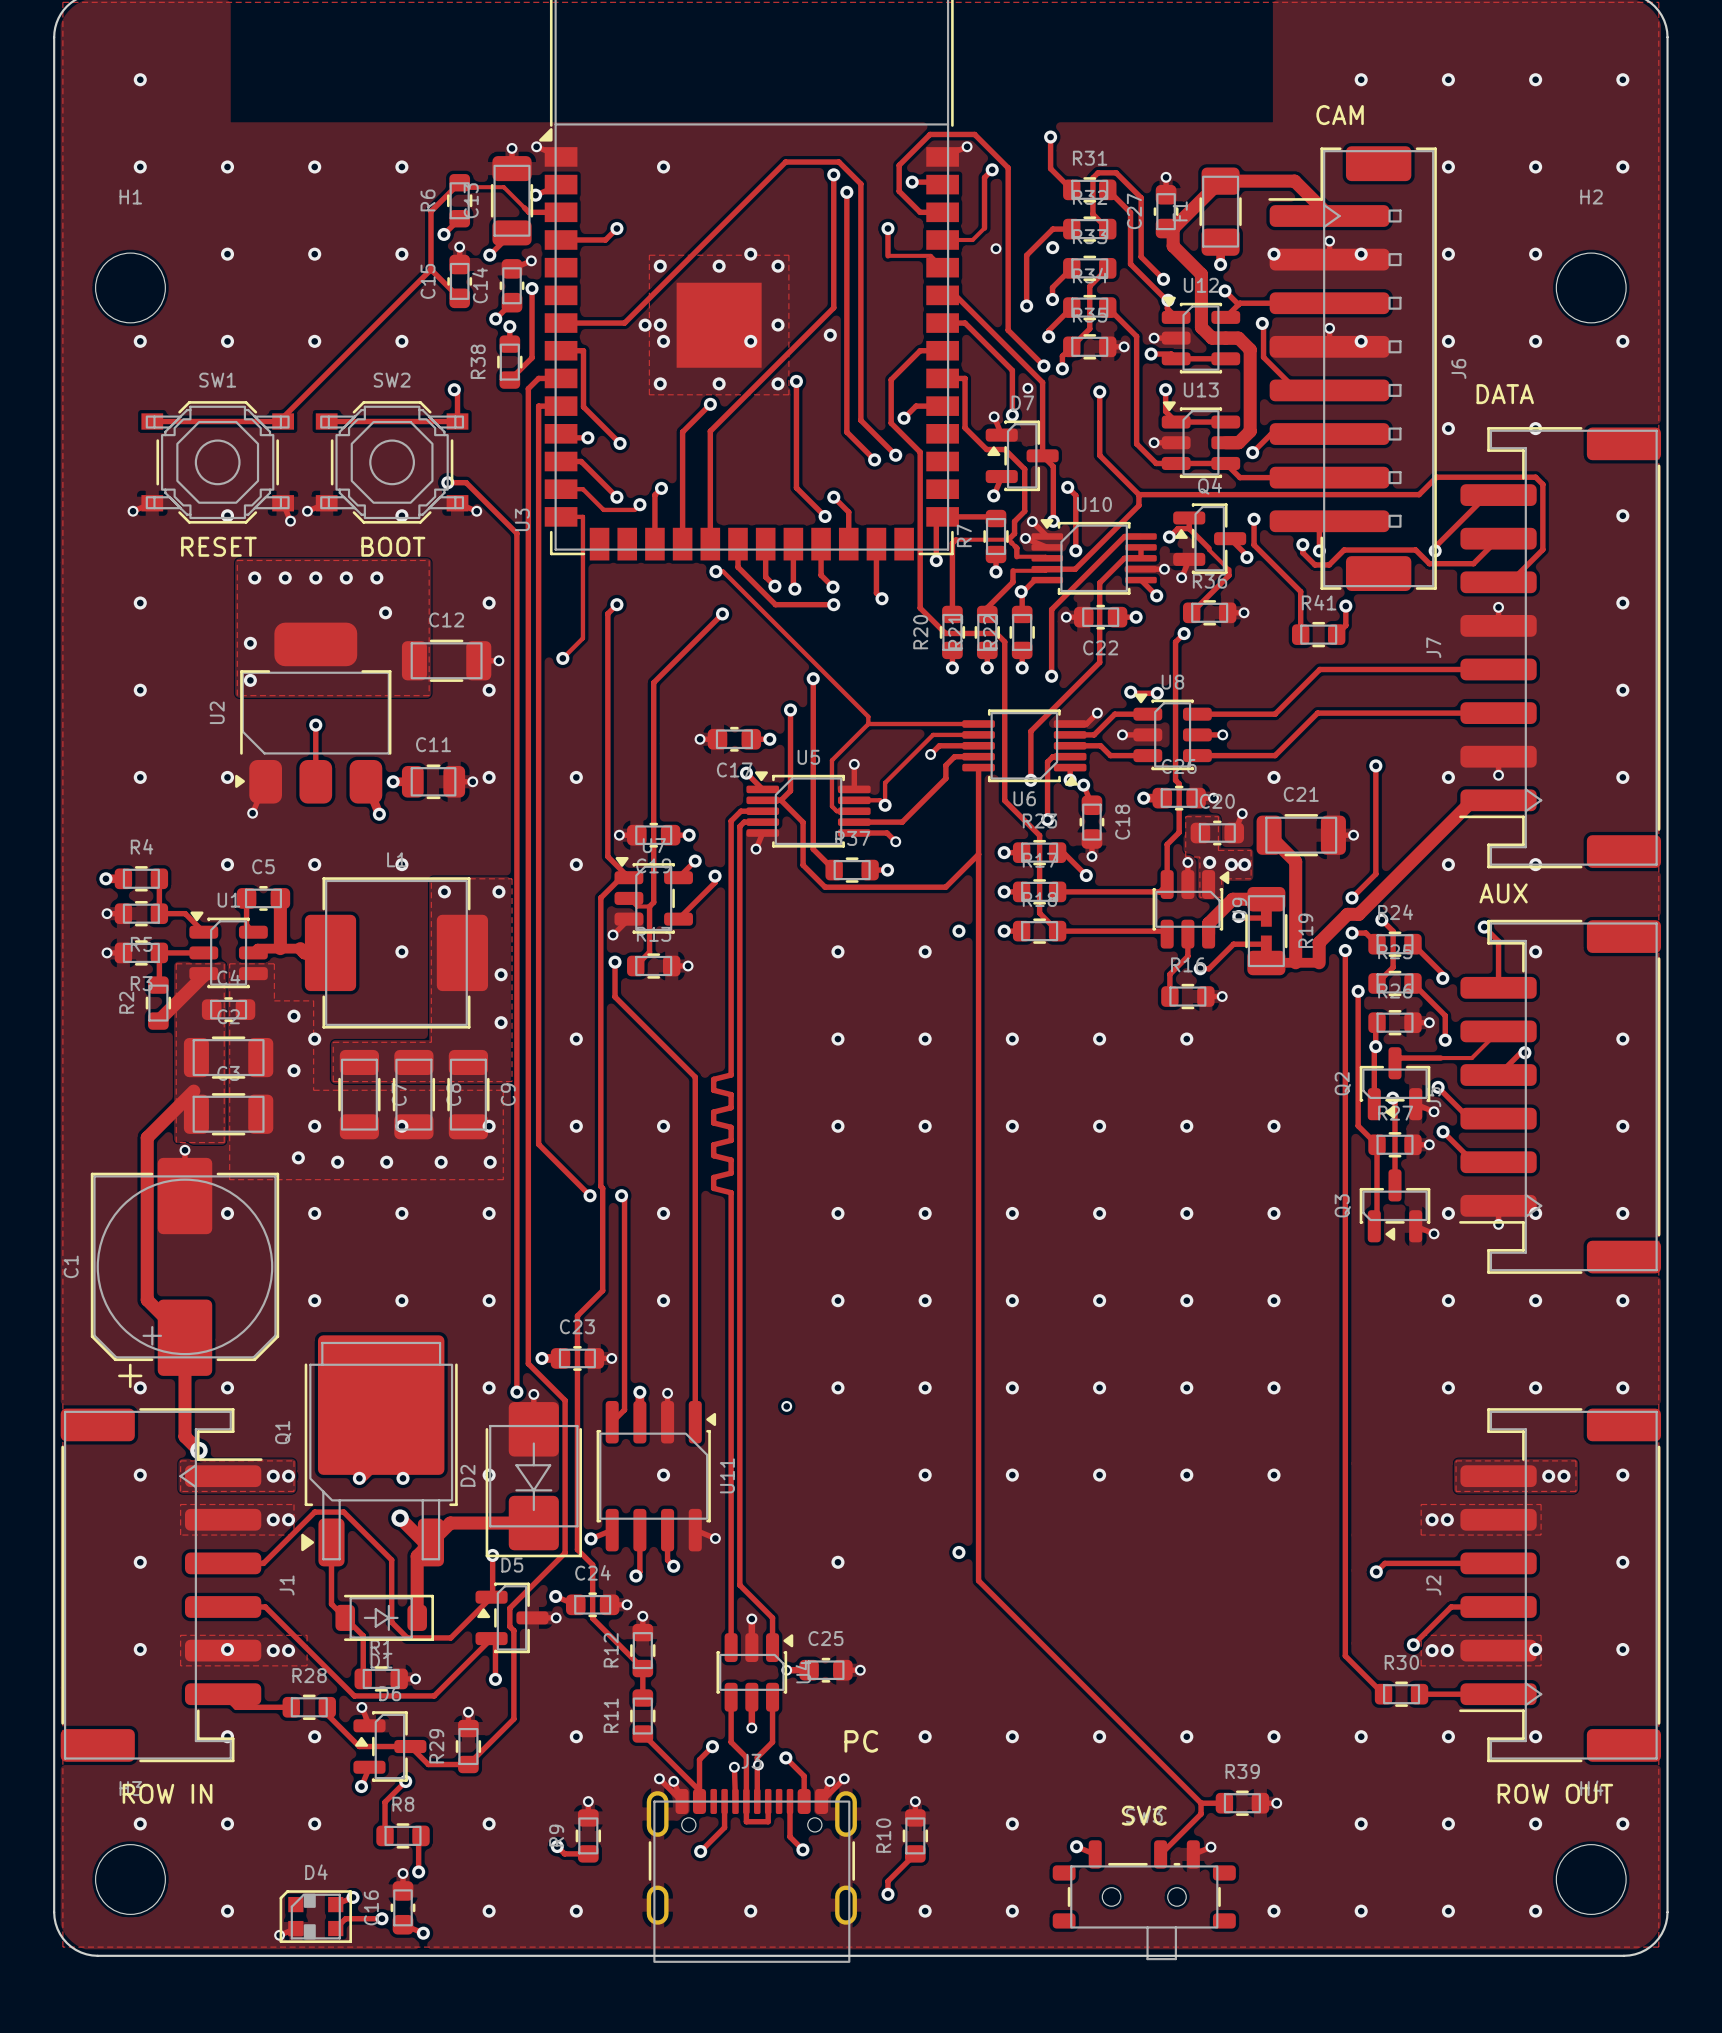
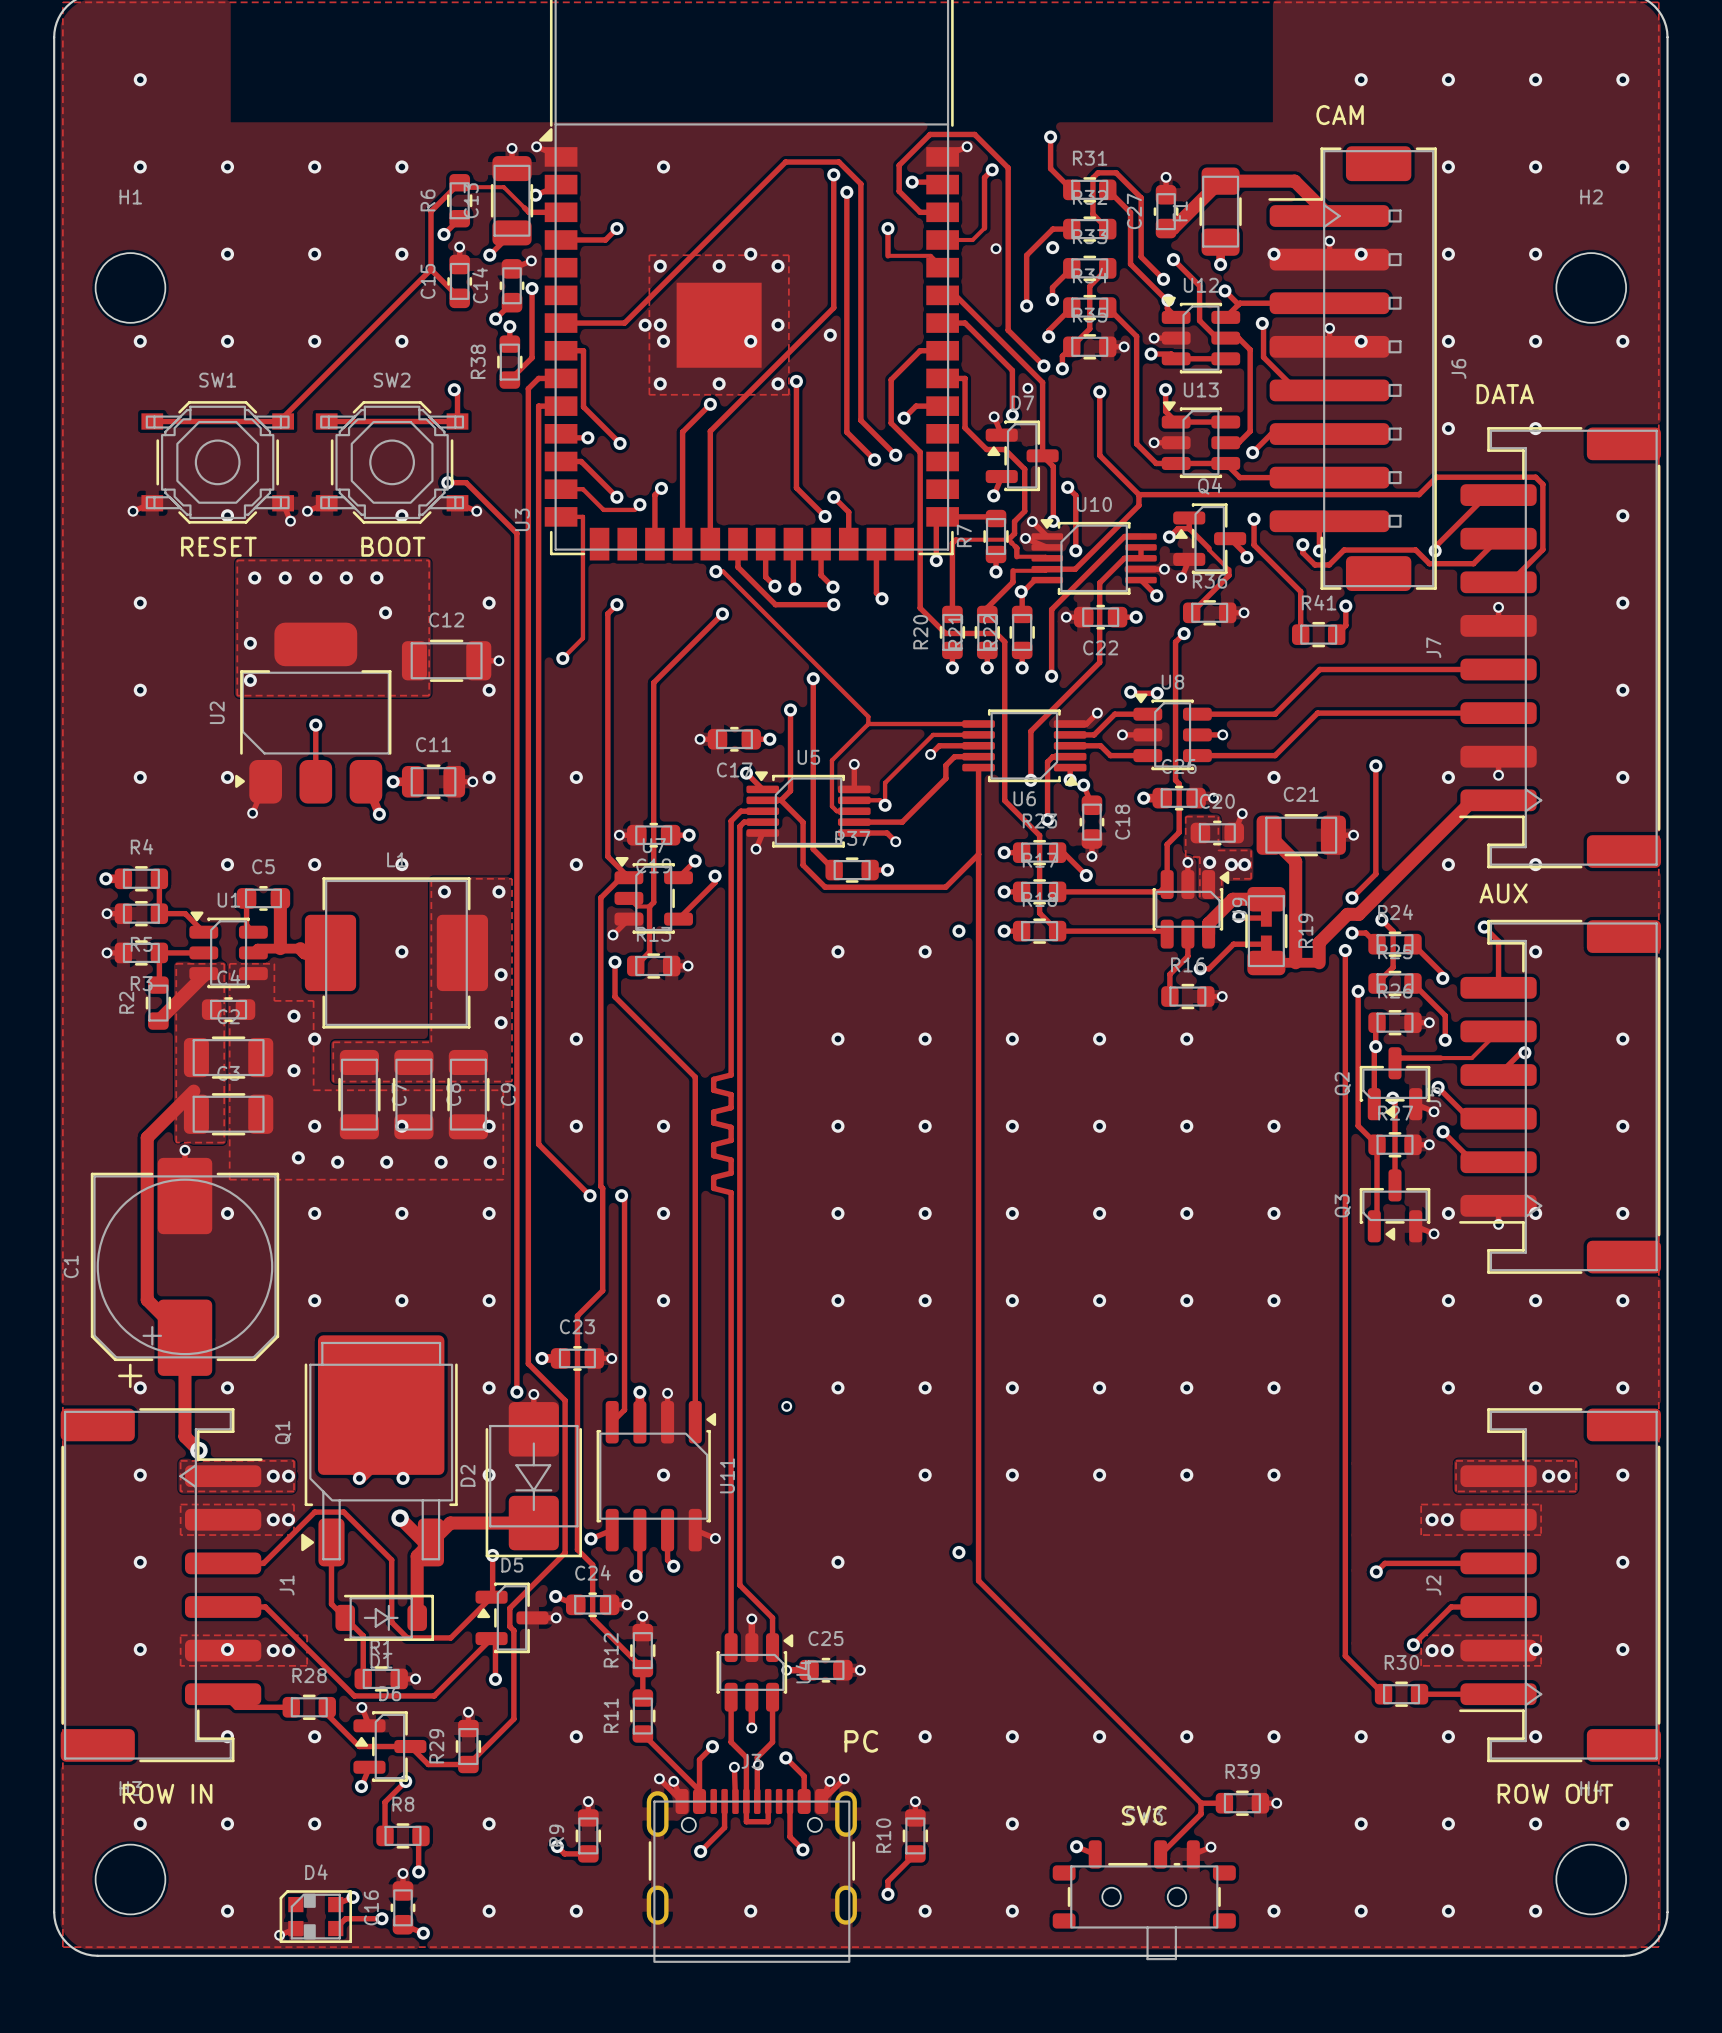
track: (1173, 228) (1173, 246) (1201, 274) (1201, 327) (1212, 338) (1217, 338) -> (1173, 259) (1199, 285) (1199, 320) (1217, 338)
via: none -> (1173, 259)
track width: thick (1217, 338) (1238, 338) (1250, 349) (1250, 431) (1238, 442) (1225, 442) -> thin (1217, 338) (1238, 338) (1250, 349) (1250, 431) (1238, 442) (1225, 442)

